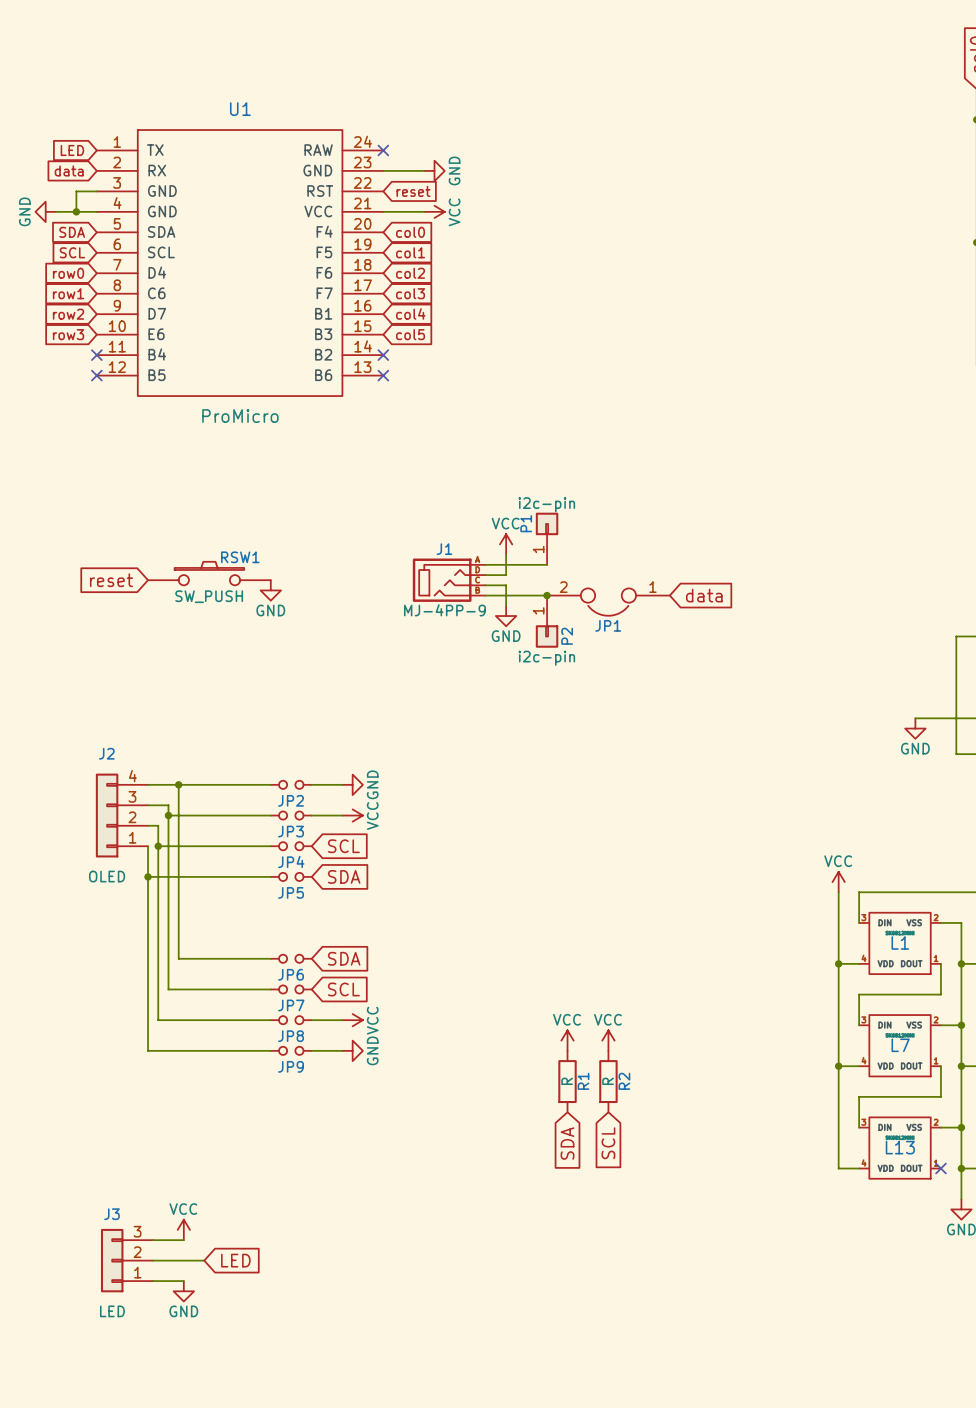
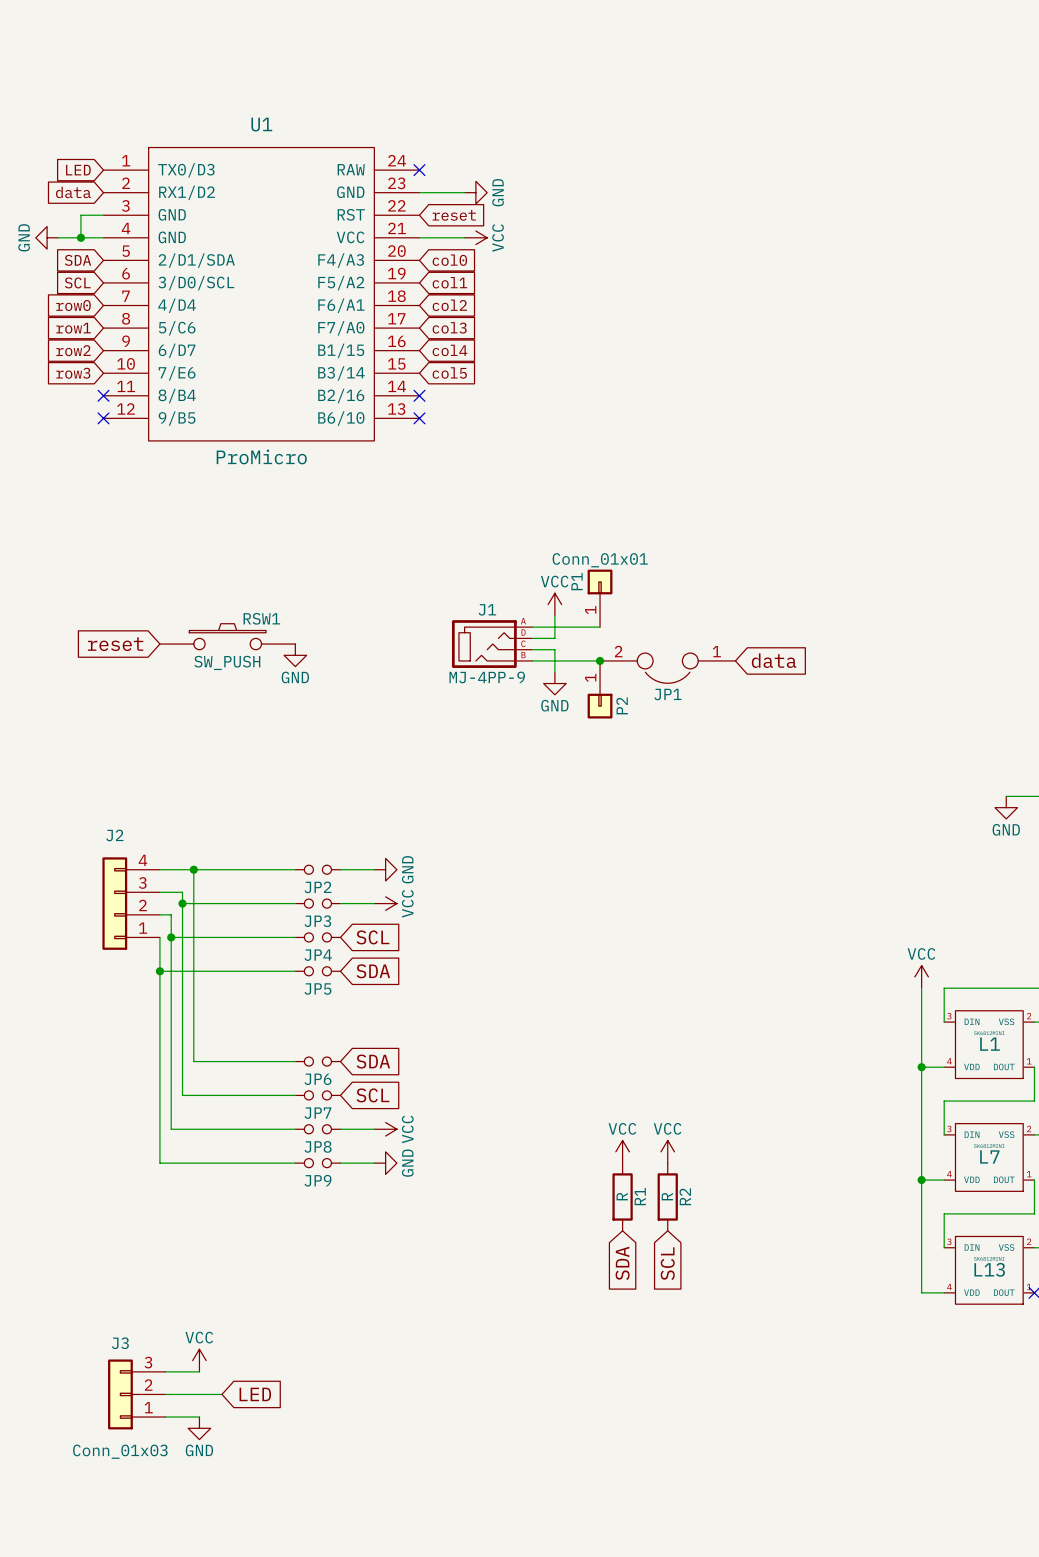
U1 symbol: [96, 130, 384, 397] -> [103, 147, 420, 441]
P1 value: i2c-pin (546, 504) -> Conn_01x01 (600, 560)
P2 value: i2c-pin (546, 658) -> none
J2 value: OLED (107, 876) -> none
J3 value: LED (112, 1311) -> Conn_01x03 (120, 1451)

